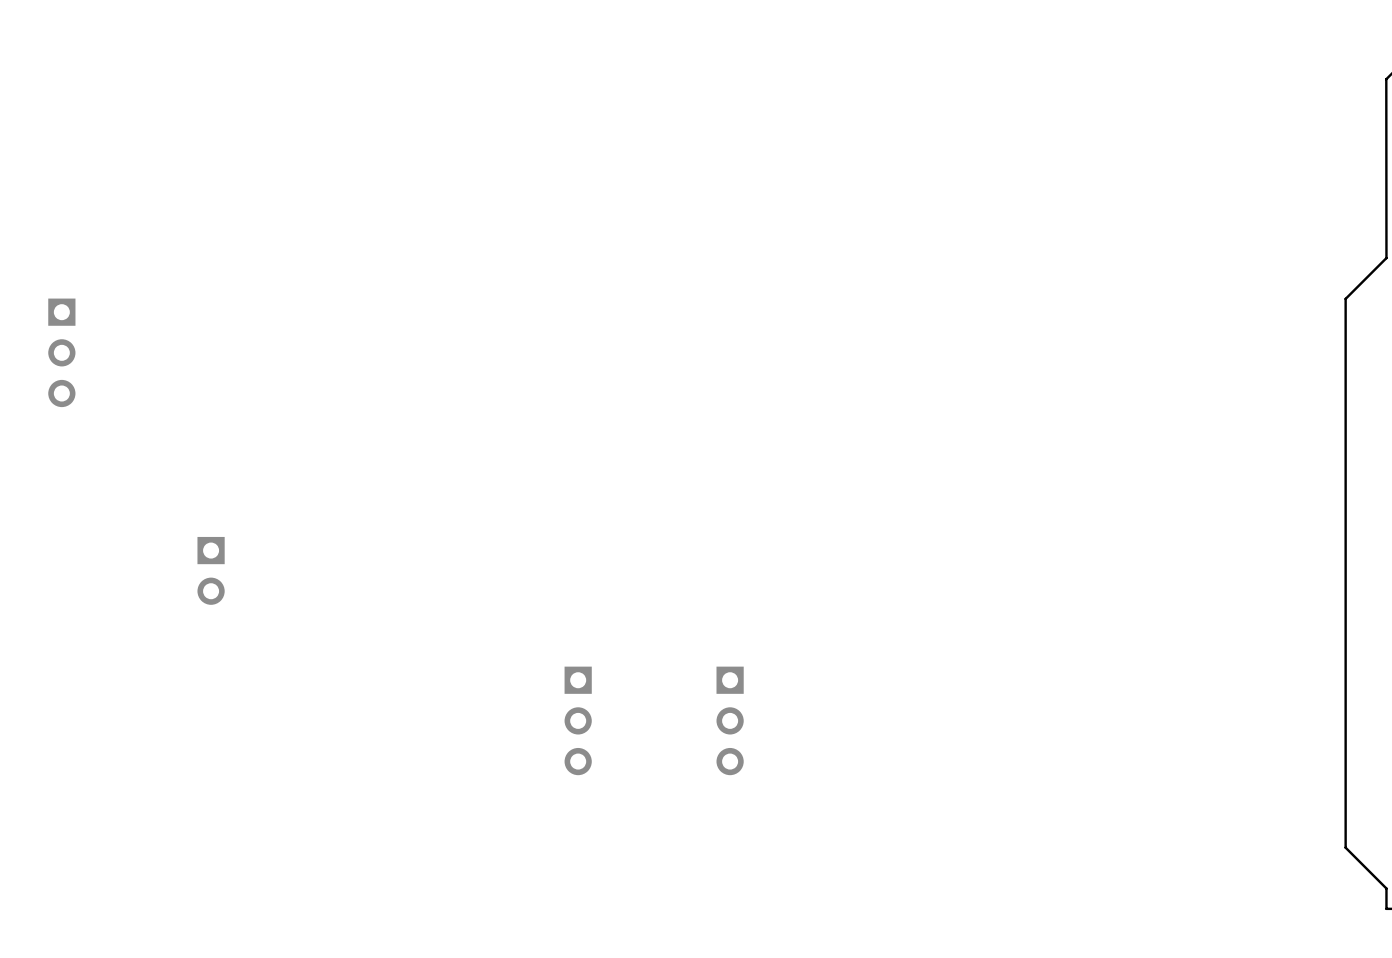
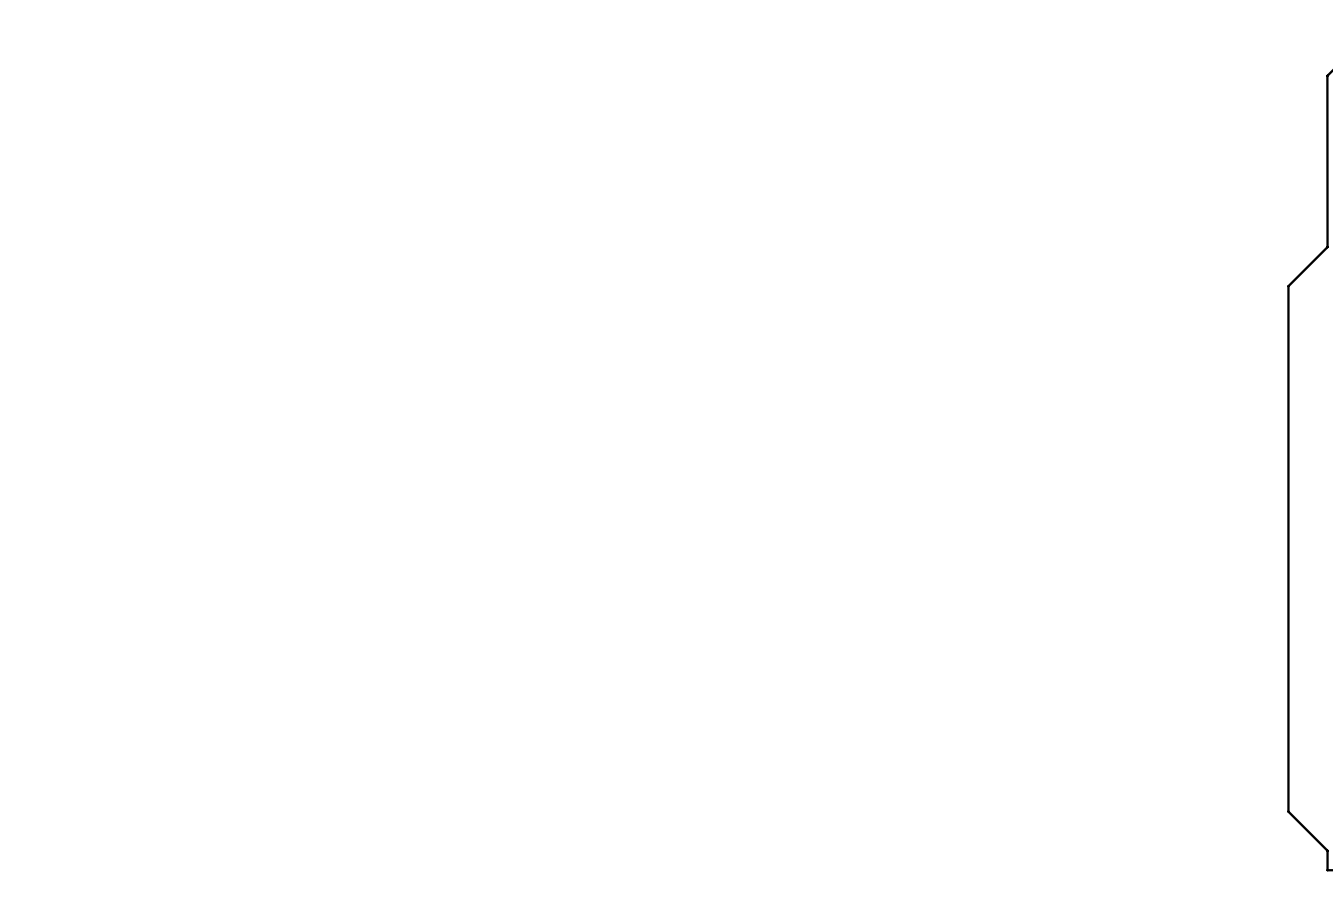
part: (61, 352) -> none
part: (211, 570) -> none
part: (578, 720) -> none
part: (730, 720) -> none

